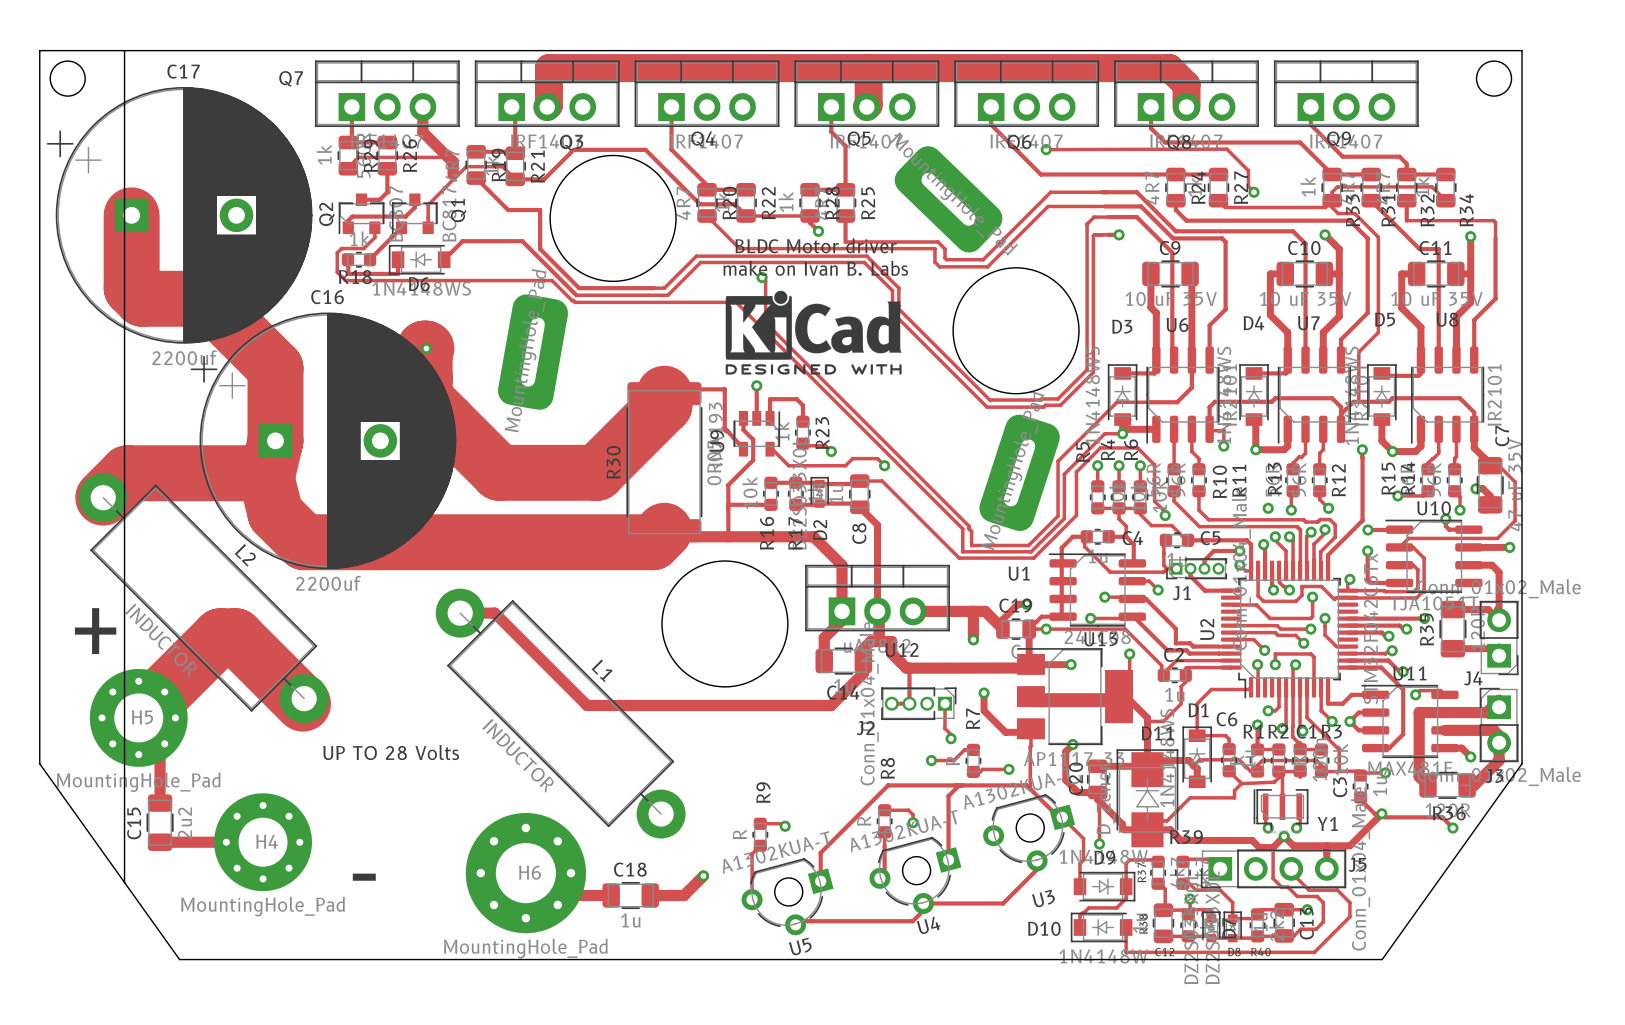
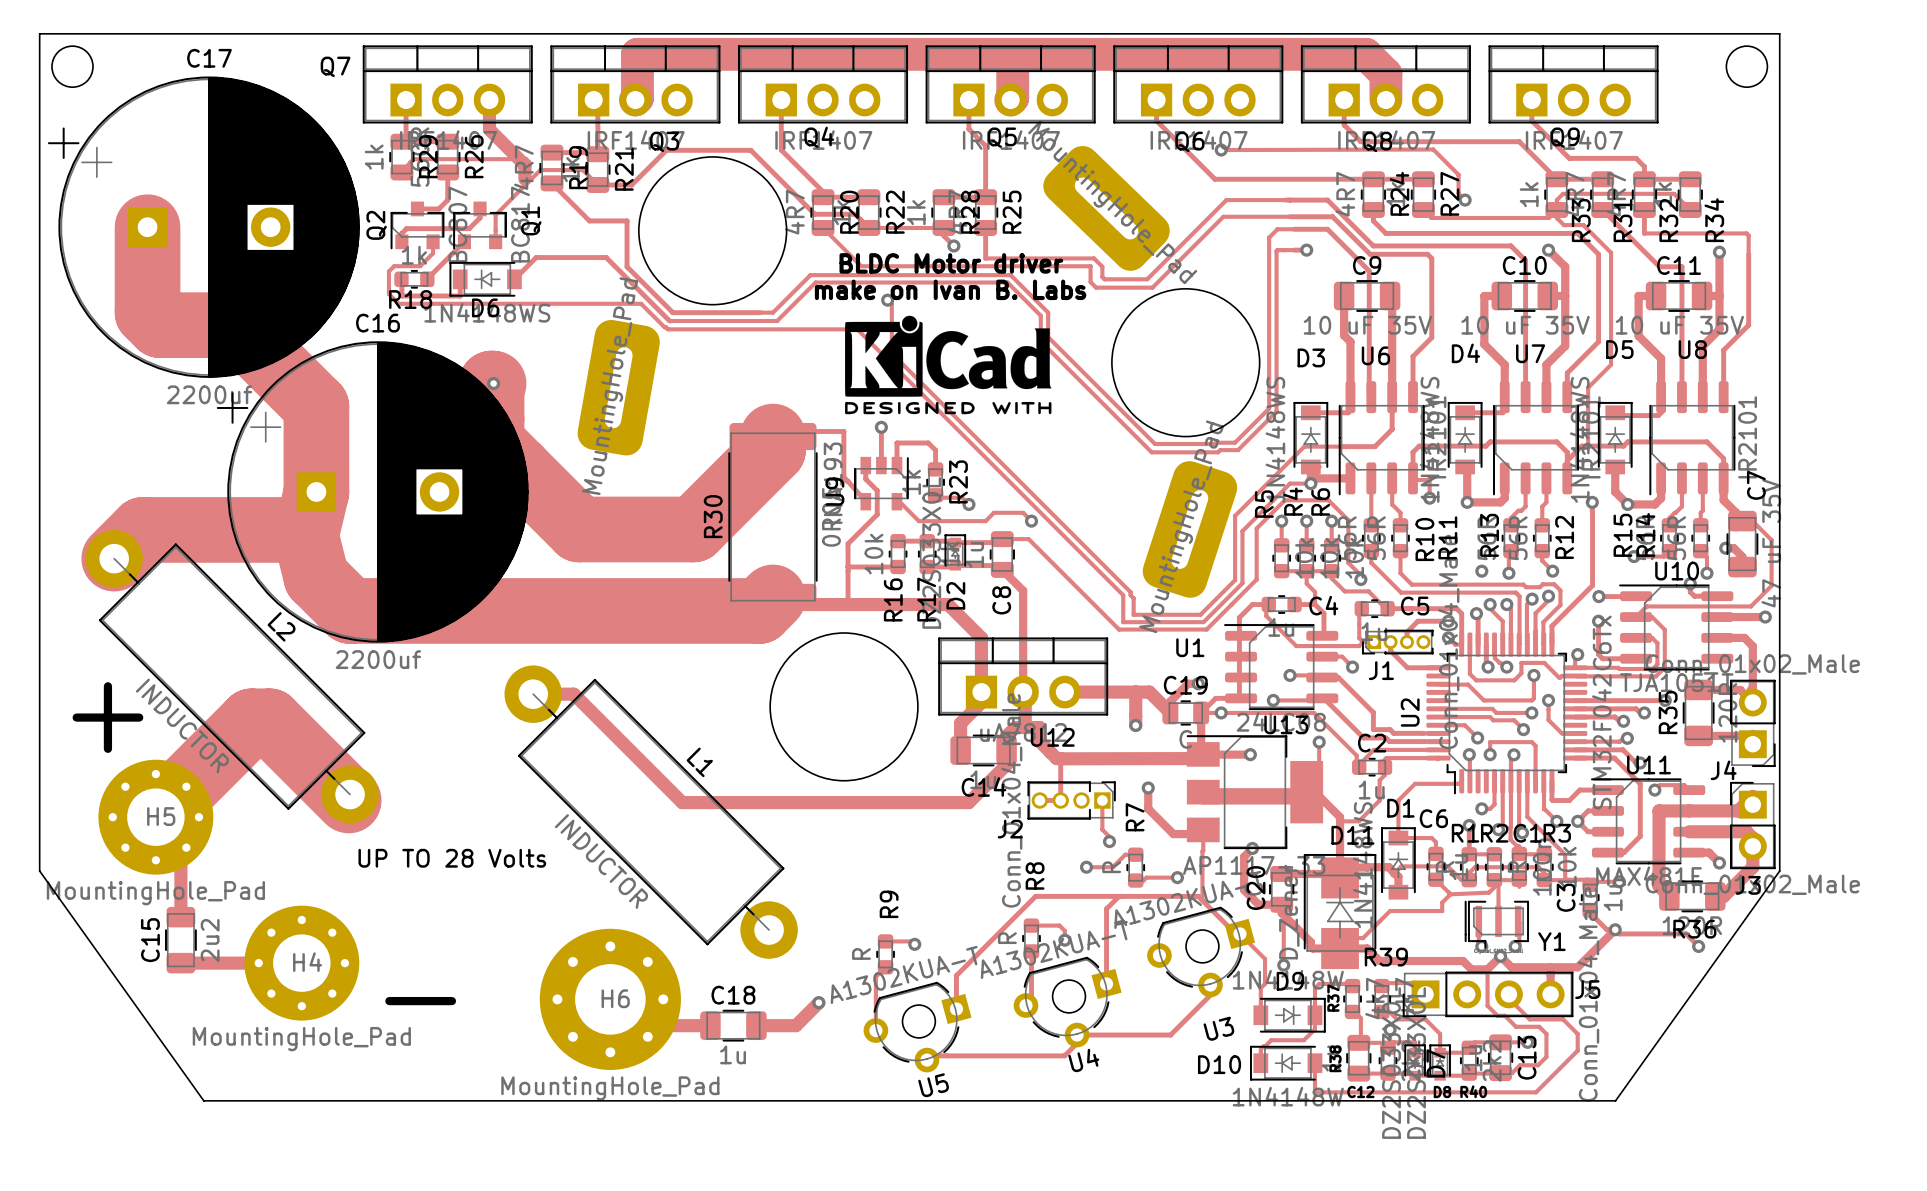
board edge: (124, 50) (124, 883) -> none

